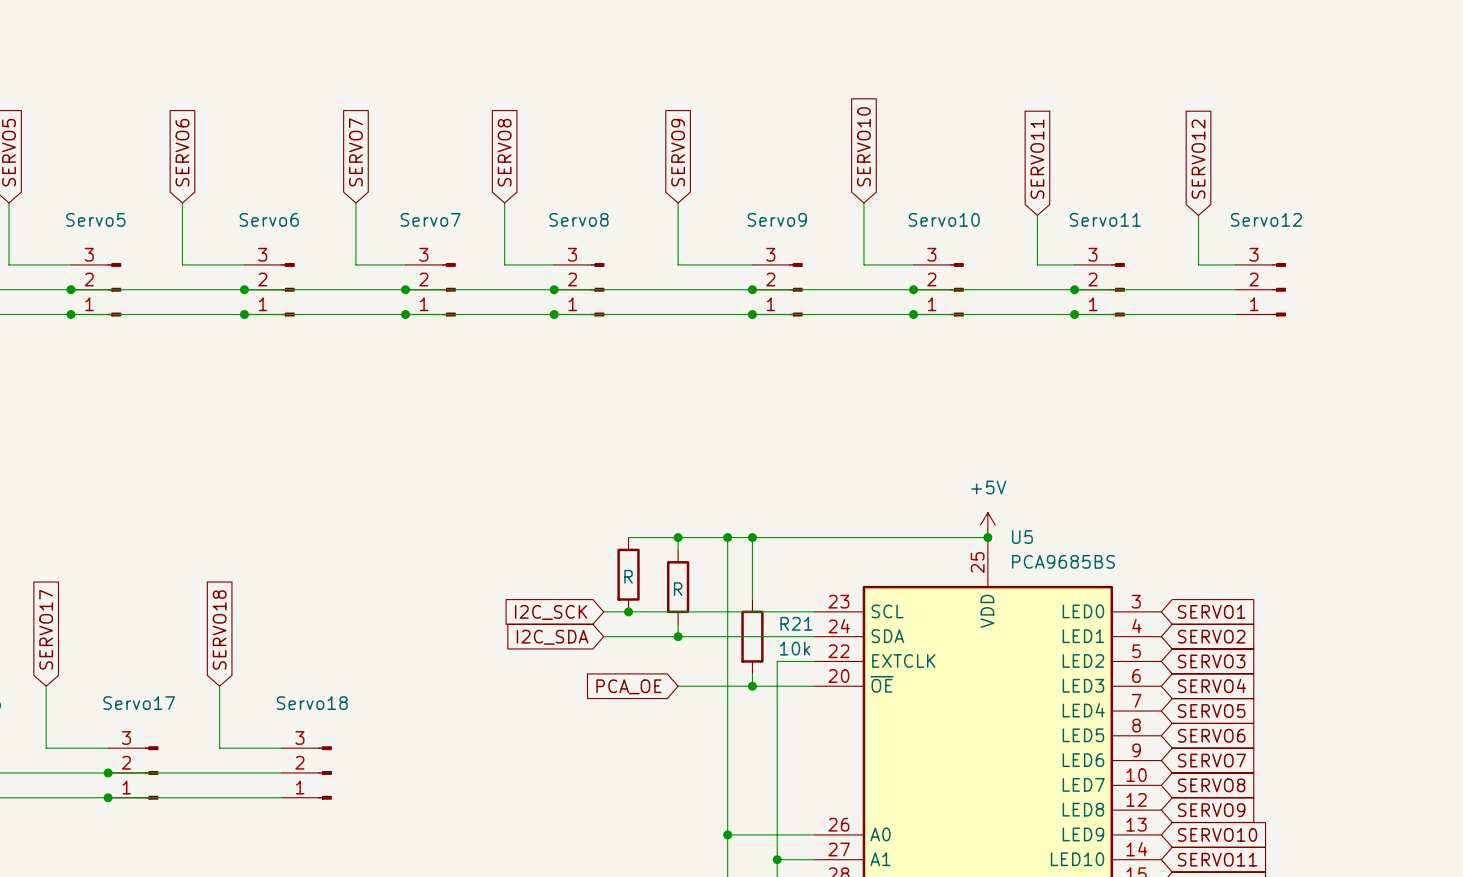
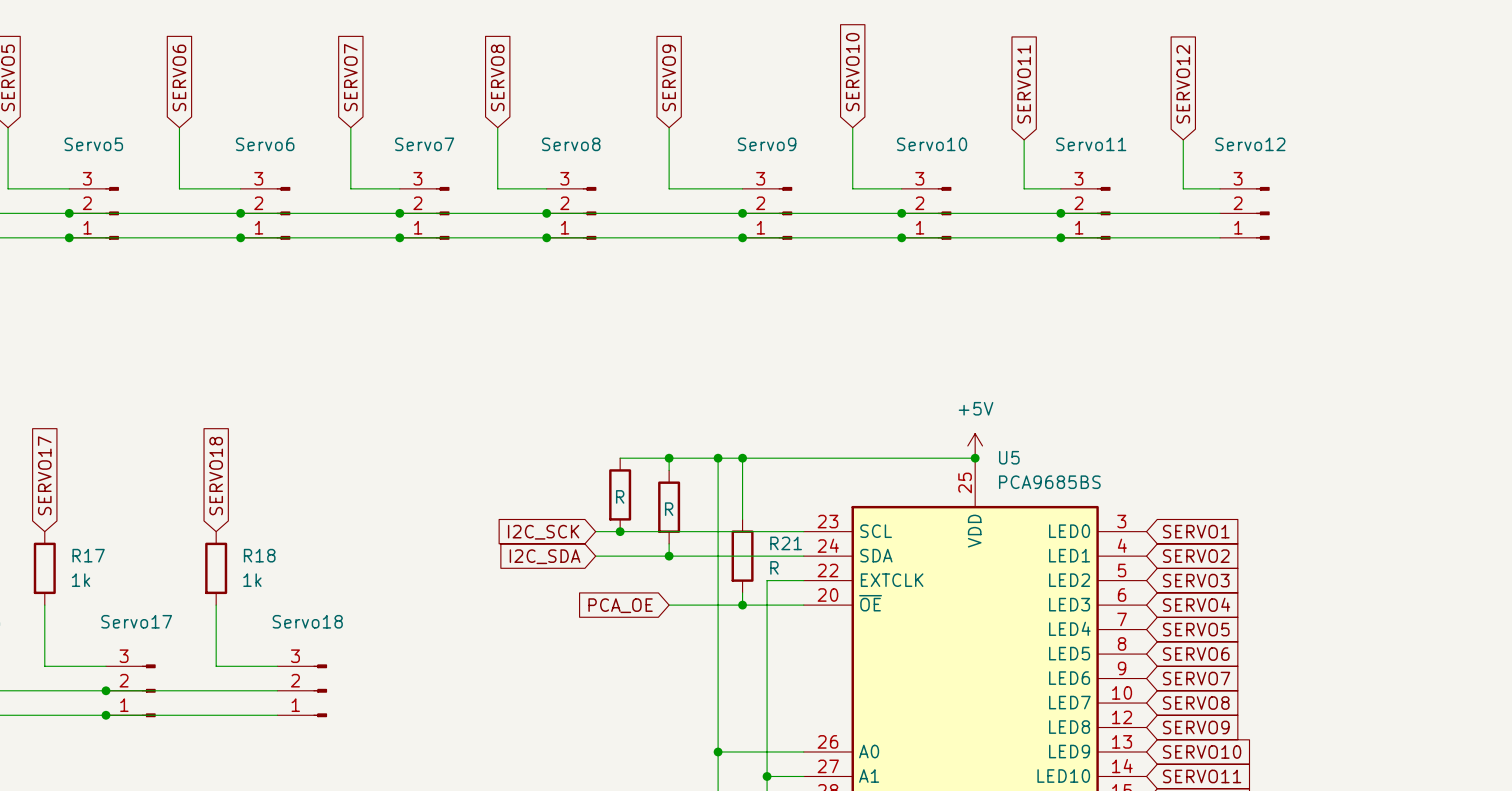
global label position: SERVO17 (46, 629) -> SERVO17 (44, 475)
global label position: SERVO18 (219, 630) -> SERVO18 (216, 476)
R21 value: 10k (795, 648) -> R (774, 567)
R17: none -> 1k (44, 568)
R18: none -> 1k (216, 568)

